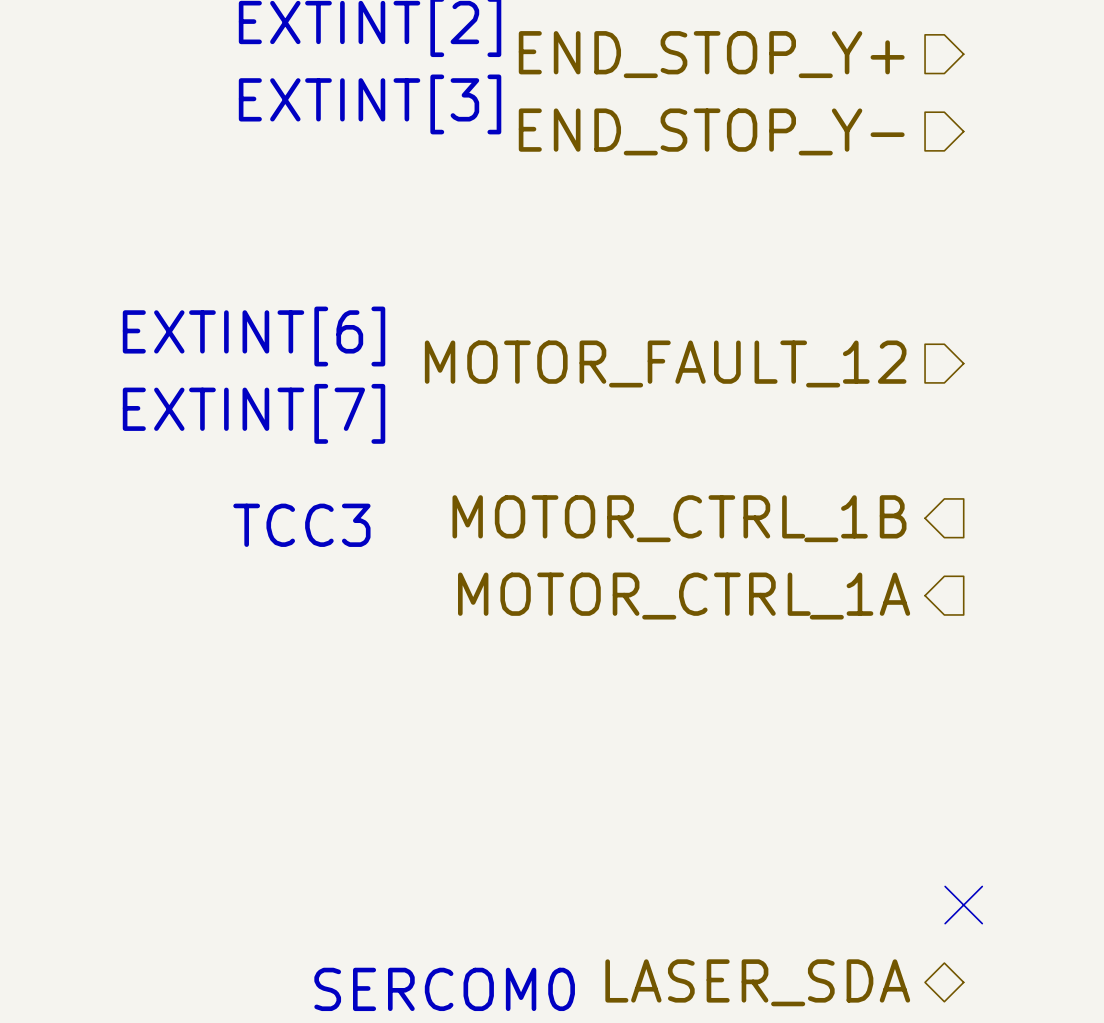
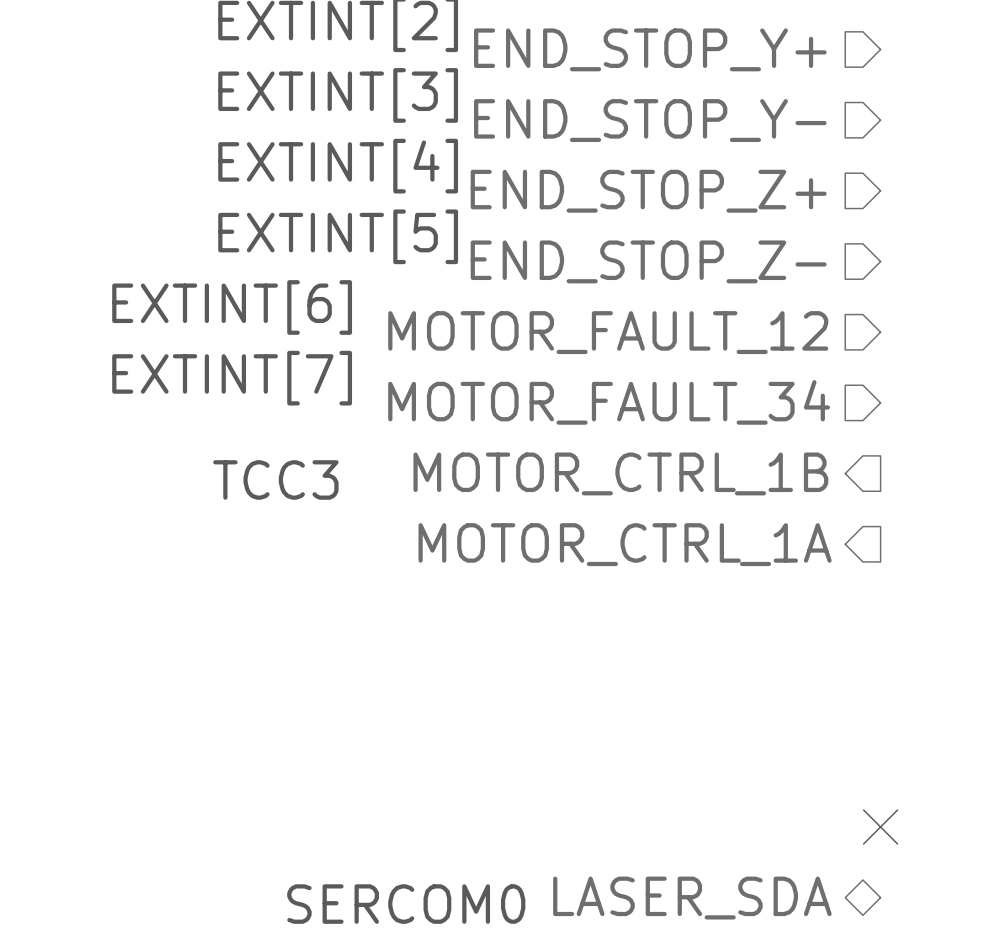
text: none -> EXTINT[4] (338, 166)
hierarchical label: none -> END_STOP_Z+ (648, 191)
text: none -> EXTINT[5] (338, 236)
hierarchical label: none -> END_STOP_Z- (648, 261)
hierarchical label: none -> MOTOR_FAULT_34 (609, 402)

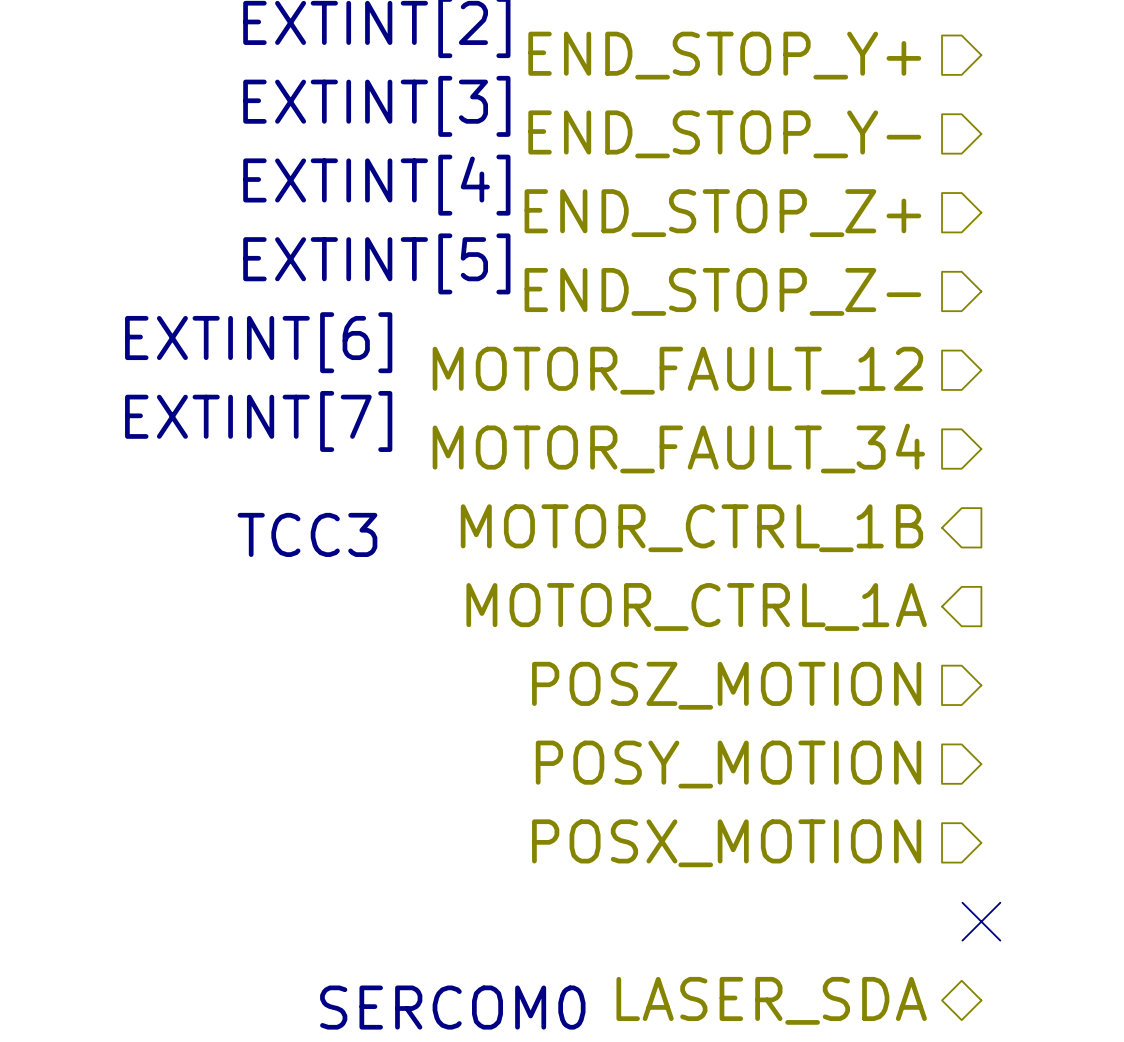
hierarchical label: none -> POSZ_MOTION (726, 685)
hierarchical label: none -> POSY_MOTION (728, 764)
hierarchical label: none -> POSX_MOTION (726, 843)

